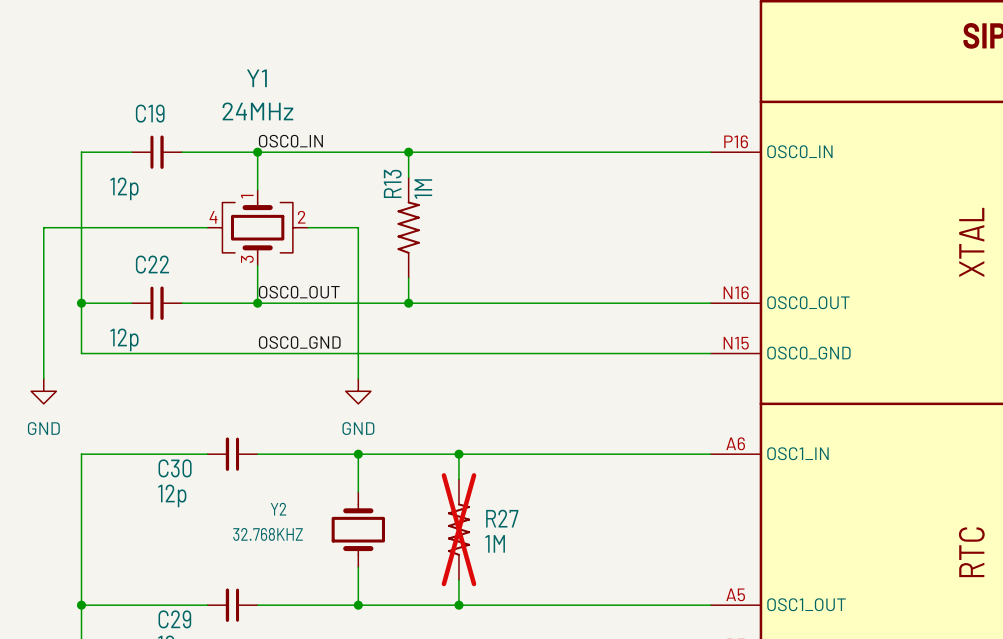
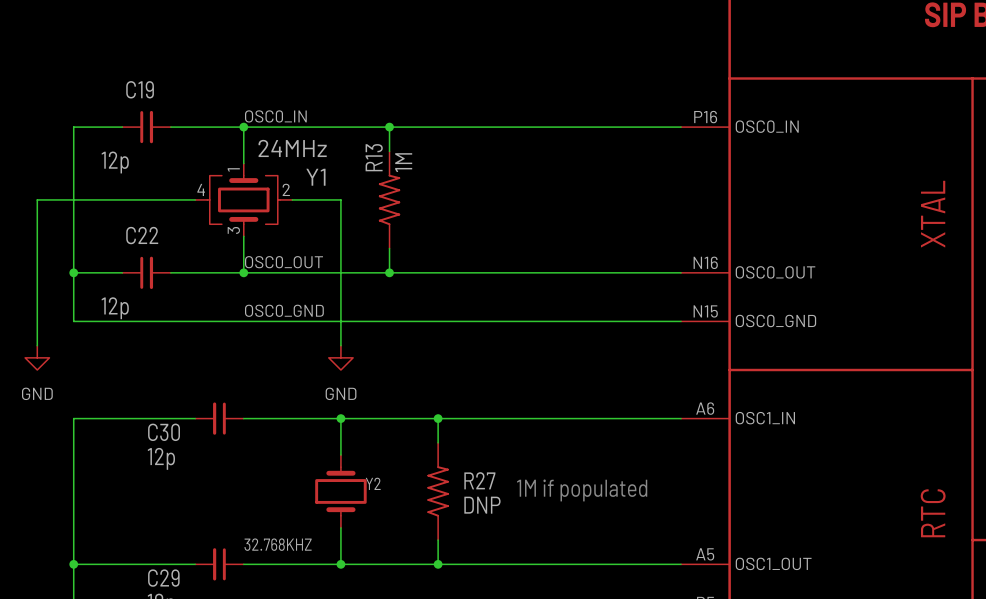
Y1 name position: Y1 (256, 78) -> Y1 (315, 177)
Y1 value position: 24MHz (257, 111) -> 24MHz (292, 148)
Y2 name position: Y2 (278, 509) -> Y2 (373, 483)
text: none -> 1M if populated (582, 490)
R27 do-not-place cross: (458, 529) -> none
Y2 value position: 32.768KHZ (268, 534) -> 32.768KHZ (278, 544)
R27 value: 1M (495, 543) -> DNP (482, 505)

